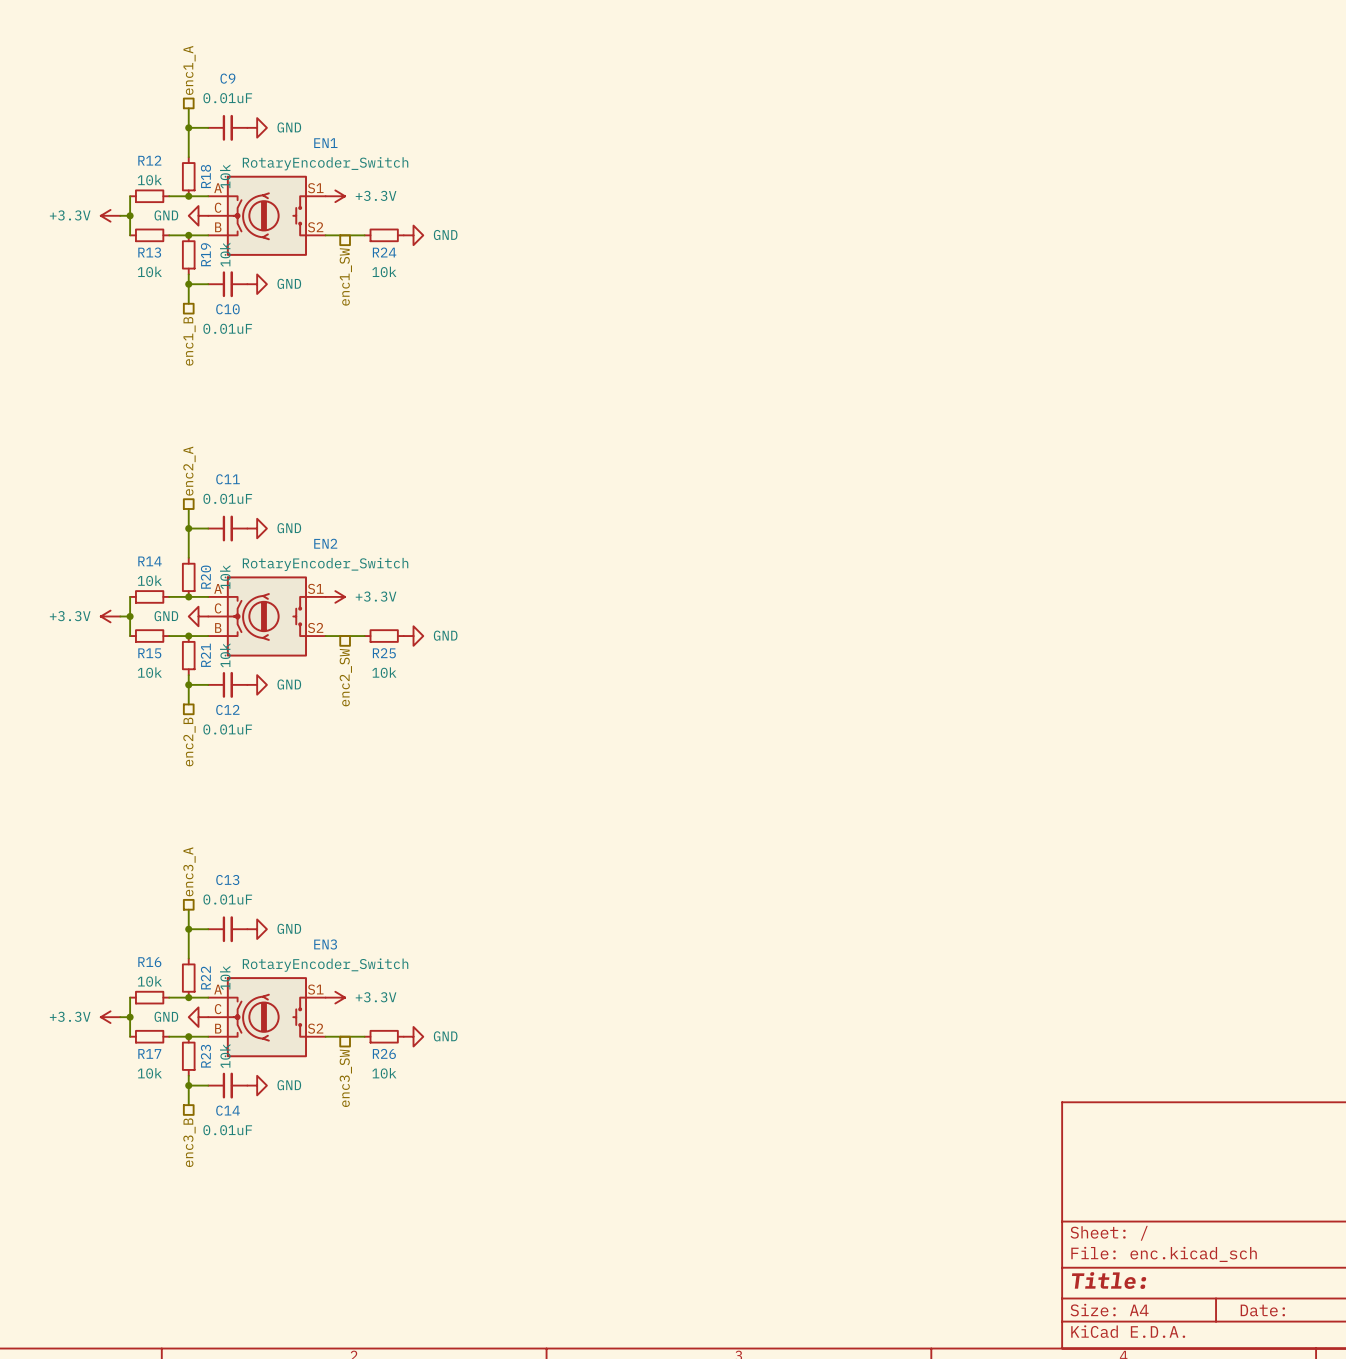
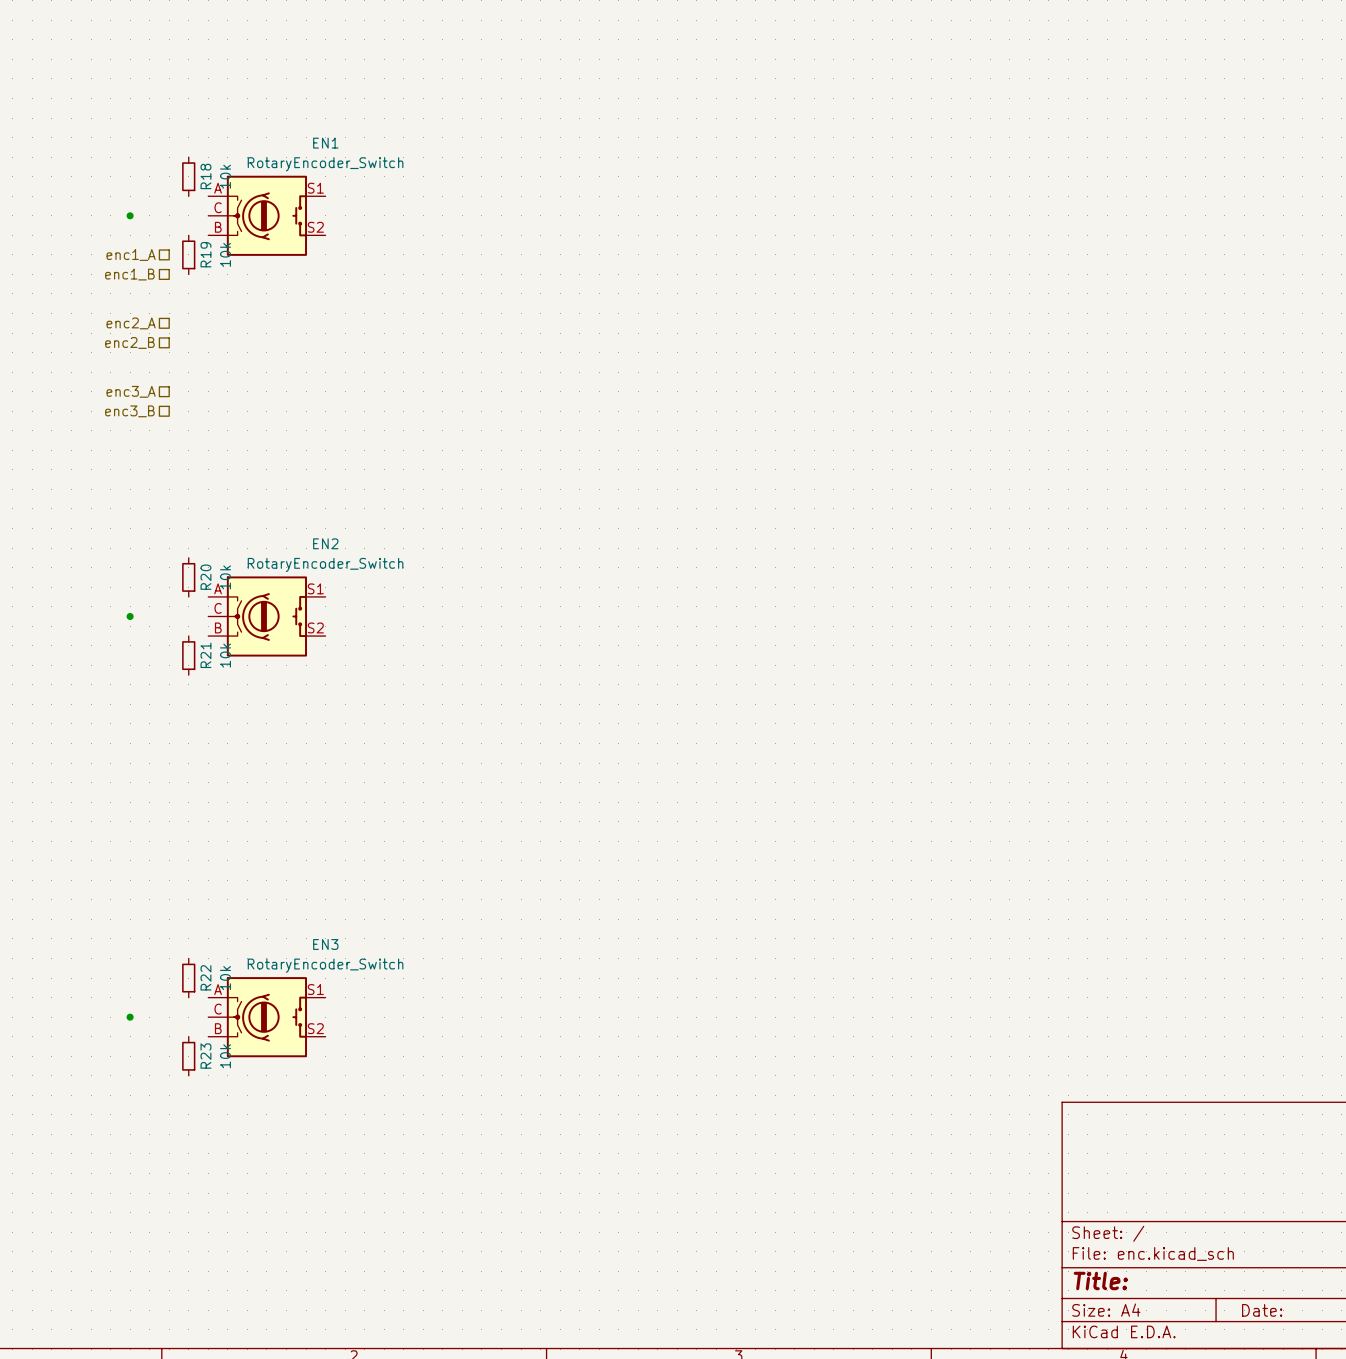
hierarchical label rotation: 0° (189, 70) -> 90° counterclockwise (131, 255)
hierarchical label position: enc1_A (189, 70) -> enc1_A (131, 255)
wire: (188, 108) (188, 157) -> none
wire: (188, 127) (208, 127) -> none
junction: (188, 127) -> none
C9: 0.01uF (227, 127) -> none
power symbol: GND (257, 127) -> none
wire: (130, 196) (130, 235) -> none
R12: 10k (149, 196) -> none
wire: (169, 196) (208, 196) -> none
junction: (188, 196) -> none
power symbol: +3.3V (335, 196) -> none
power symbol: +3.3V (110, 215) -> none
wire: (120, 215) (130, 215) -> none
power symbol: GND (198, 215) -> none
R13: 10k (149, 235) -> none
wire: (169, 235) (208, 235) -> none
junction: (188, 235) -> none
wire: (325, 235) (364, 235) -> none
R24: 10k (384, 235) -> none
power symbol: GND (413, 235) -> none
wire: (188, 274) (188, 303) -> none
hierarchical label: enc1_SW (345, 276) -> none
wire: (188, 284) (208, 284) -> none
junction: (188, 284) -> none
C10: 0.01uF (227, 284) -> none
power symbol: GND (257, 284) -> none
hierarchical label rotation: 0° (189, 341) -> 90° clockwise (129, 274)
hierarchical label position: enc1_B (189, 341) -> enc1_B (129, 274)
hierarchical label: none -> enc2_B (129, 342)
hierarchical label: none -> enc3_A (131, 391)
hierarchical label: none -> enc3_B (129, 411)
hierarchical label rotation: 0° (189, 471) -> 90° counterclockwise (131, 323)
hierarchical label position: enc2_A (189, 471) -> enc2_A (131, 323)
wire: (188, 508) (188, 557) -> none
wire: (188, 528) (208, 528) -> none
junction: (188, 528) -> none
C11: 0.01uF (227, 528) -> none
power symbol: GND (257, 528) -> none
wire: (130, 596) (130, 636) -> none
R14: 10k (149, 596) -> none
wire: (169, 596) (208, 596) -> none
junction: (188, 596) -> none
power symbol: +3.3V (335, 596) -> none
power symbol: +3.3V (110, 616) -> none
wire: (120, 616) (130, 616) -> none
power symbol: GND (198, 616) -> none
R15: 10k (149, 636) -> none
wire: (169, 636) (208, 636) -> none
junction: (188, 636) -> none
wire: (325, 636) (364, 636) -> none
R25: 10k (384, 636) -> none
power symbol: GND (413, 636) -> none
wire: (188, 675) (188, 704) -> none
hierarchical label: enc2_SW (345, 677) -> none
wire: (188, 684) (208, 684) -> none
junction: (188, 684) -> none
C12: 0.01uF (227, 684) -> none
power symbol: GND (257, 684) -> none
hierarchical label: enc2_B (189, 741) -> none
hierarchical label: enc3_A (189, 871) -> none
wire: (188, 909) (188, 958) -> none
wire: (188, 929) (208, 929) -> none
junction: (188, 929) -> none
C13: 0.01uF (227, 929) -> none
power symbol: GND (257, 929) -> none
wire: (130, 997) (130, 1036) -> none
R16: 10k (149, 997) -> none
wire: (169, 997) (208, 997) -> none
junction: (188, 997) -> none
power symbol: +3.3V (335, 997) -> none
power symbol: +3.3V (110, 1017) -> none
wire: (120, 1017) (130, 1017) -> none
power symbol: GND (198, 1017) -> none
R17: 10k (149, 1036) -> none
wire: (169, 1036) (208, 1036) -> none
junction: (188, 1036) -> none
wire: (325, 1036) (364, 1036) -> none
R26: 10k (384, 1036) -> none
power symbol: GND (413, 1036) -> none
wire: (188, 1075) (188, 1105) -> none
hierarchical label: enc3_SW (345, 1078) -> none
wire: (188, 1085) (208, 1085) -> none
junction: (188, 1085) -> none
C14: 0.01uF (227, 1085) -> none
power symbol: GND (257, 1085) -> none
hierarchical label: enc3_B (189, 1142) -> none

